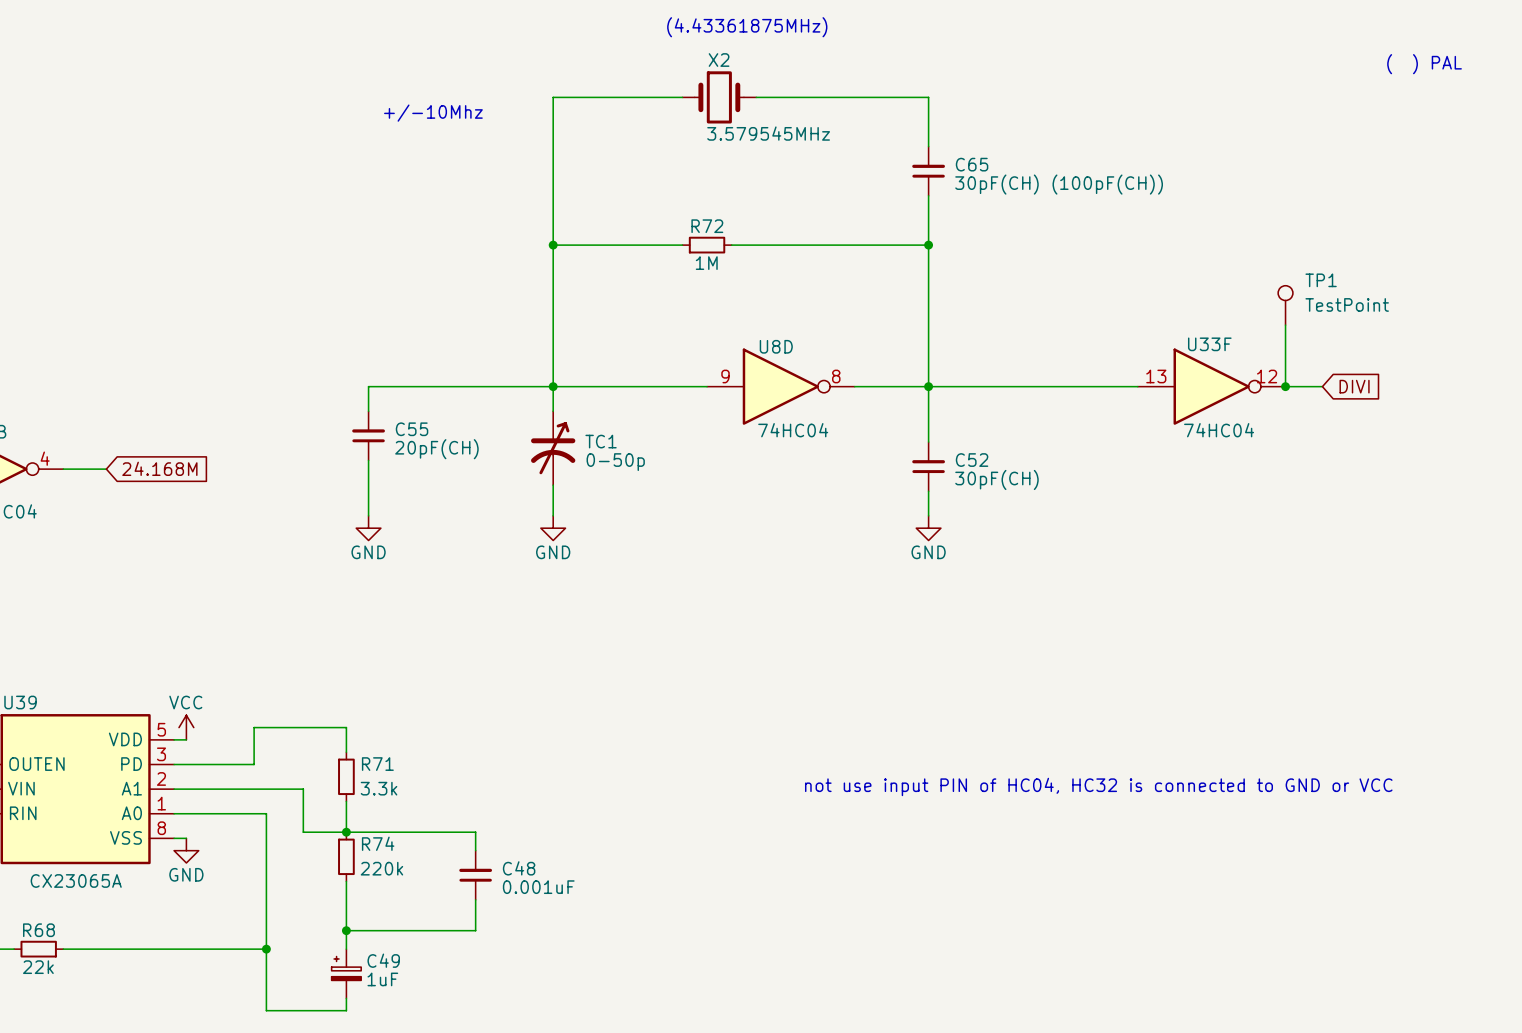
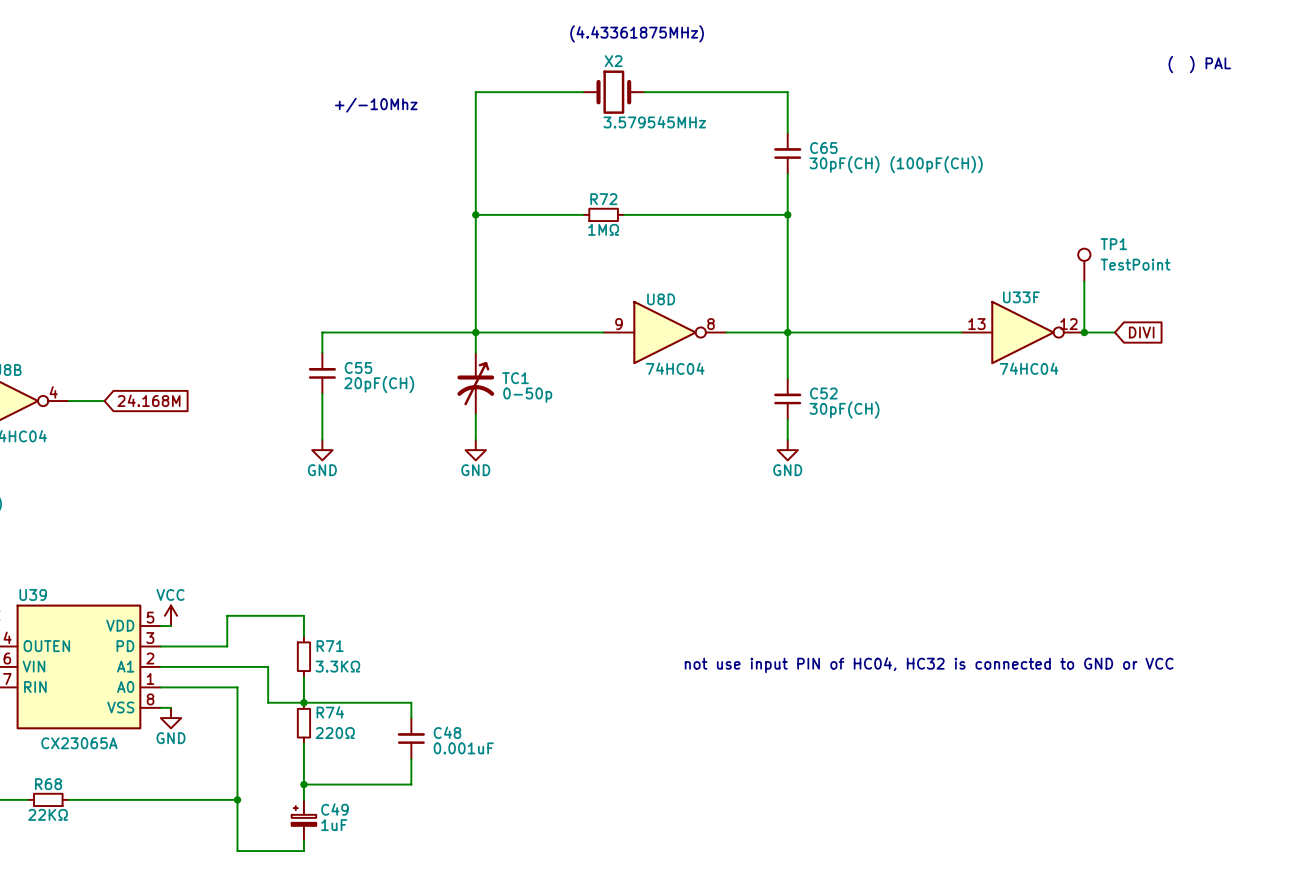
R72 value: 1M (706, 263) -> 1MΩ (603, 229)
R71 value: 3.3k (379, 788) -> 3.3KΩ (337, 666)
R74 value: 220k (381, 868) -> 220Ω (335, 733)
R68 value: 22k (38, 967) -> 22KΩ (48, 814)

